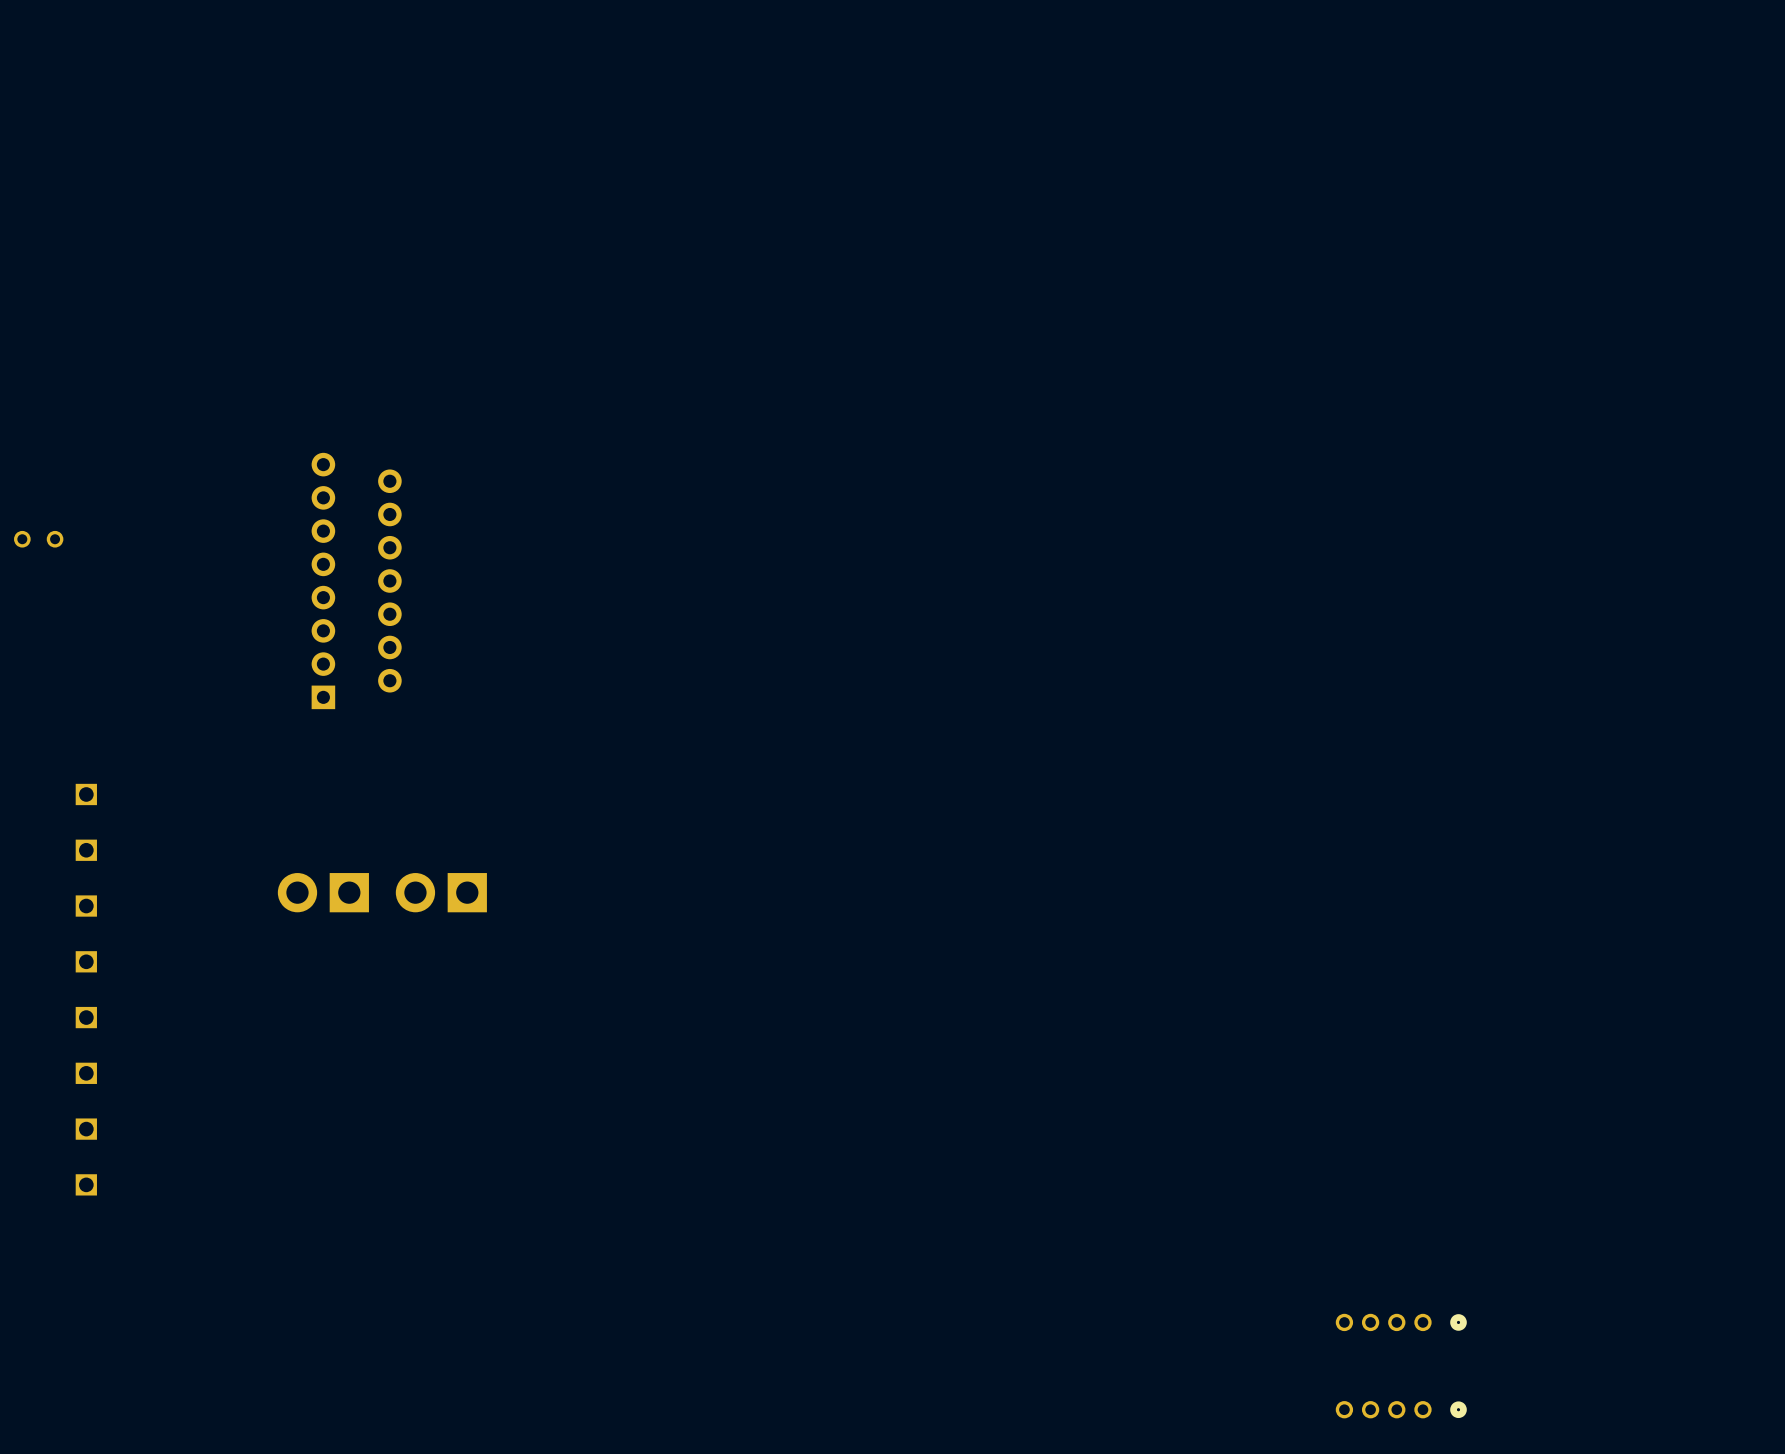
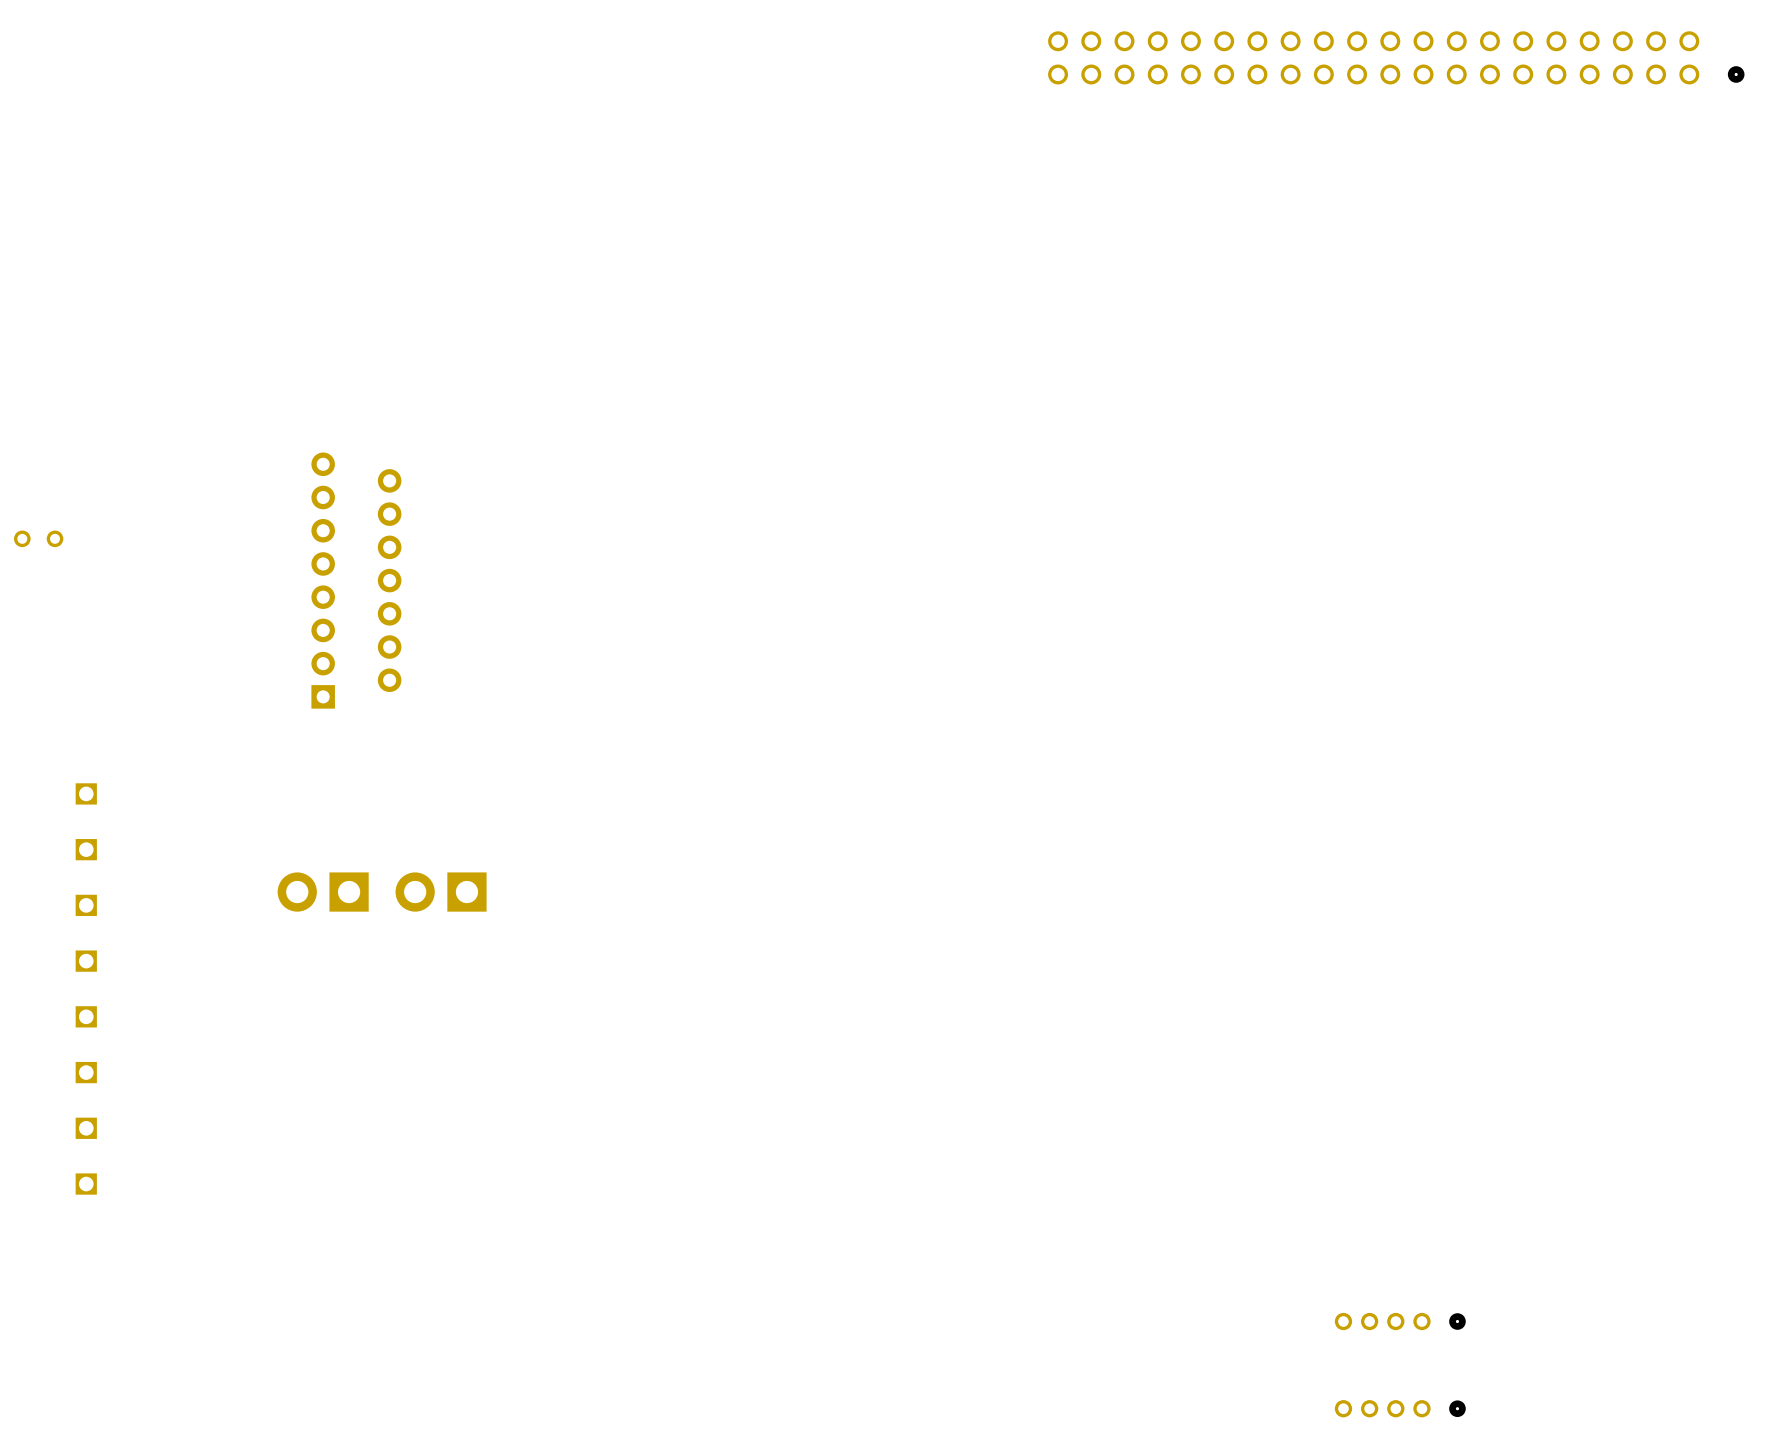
part: none -> (1396, 57)

